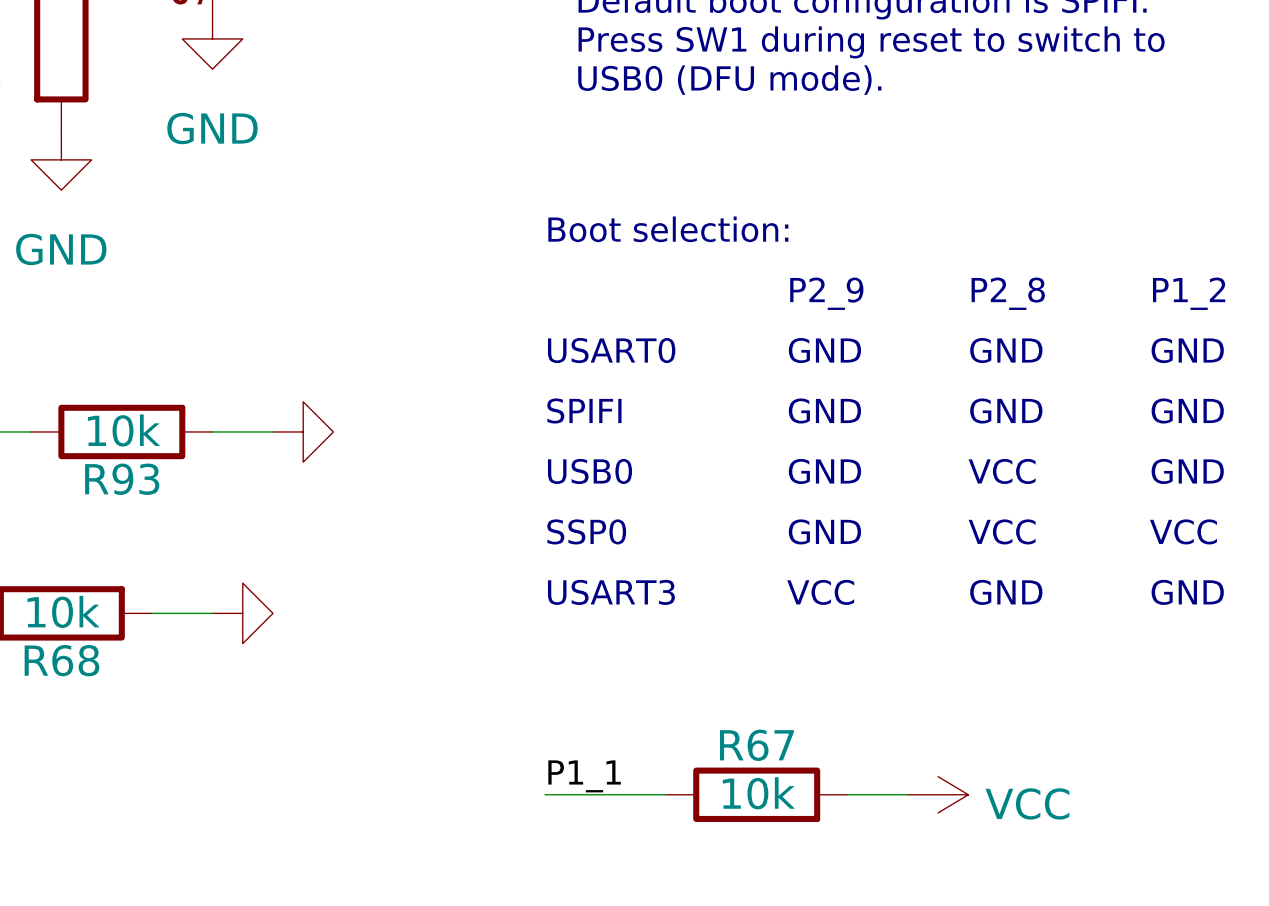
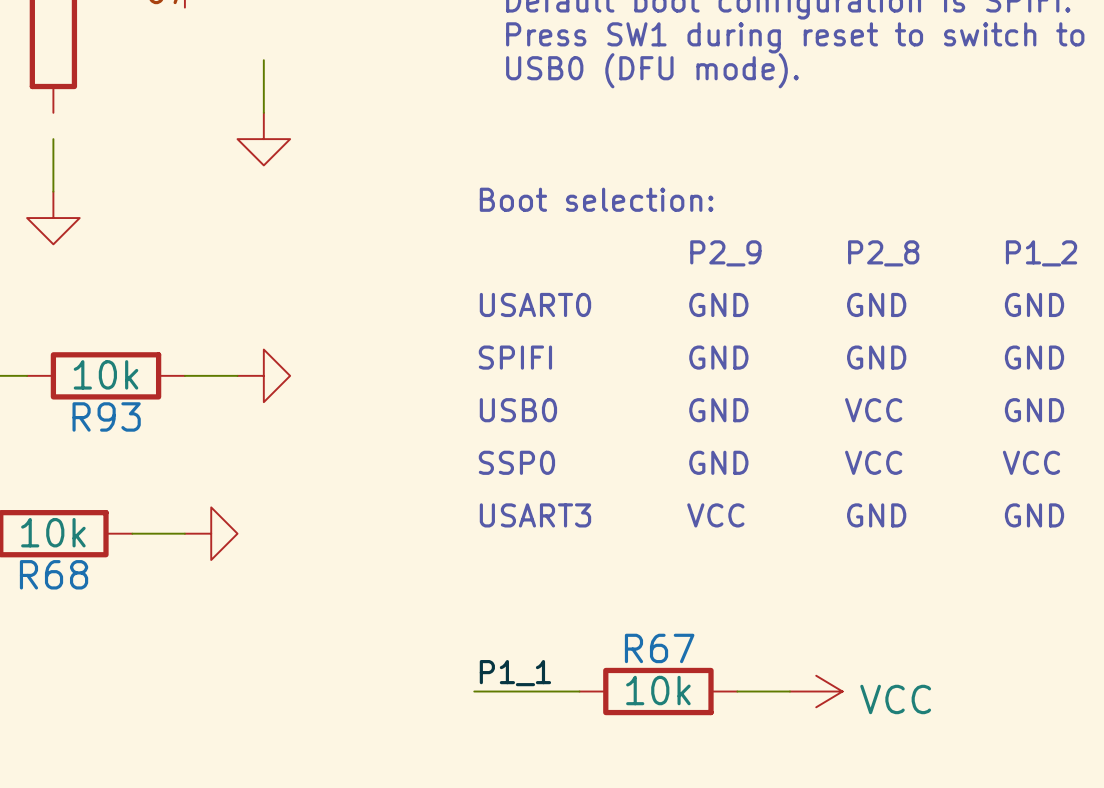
power symbol: GND (212, 38) -> none
wire: none -> (263, 60) (263, 112)
wire: none -> (53, 139) (53, 191)
power symbol: GND (61, 159) -> none
power symbol: none -> (263, 139)
power symbol: none -> (53, 218)

